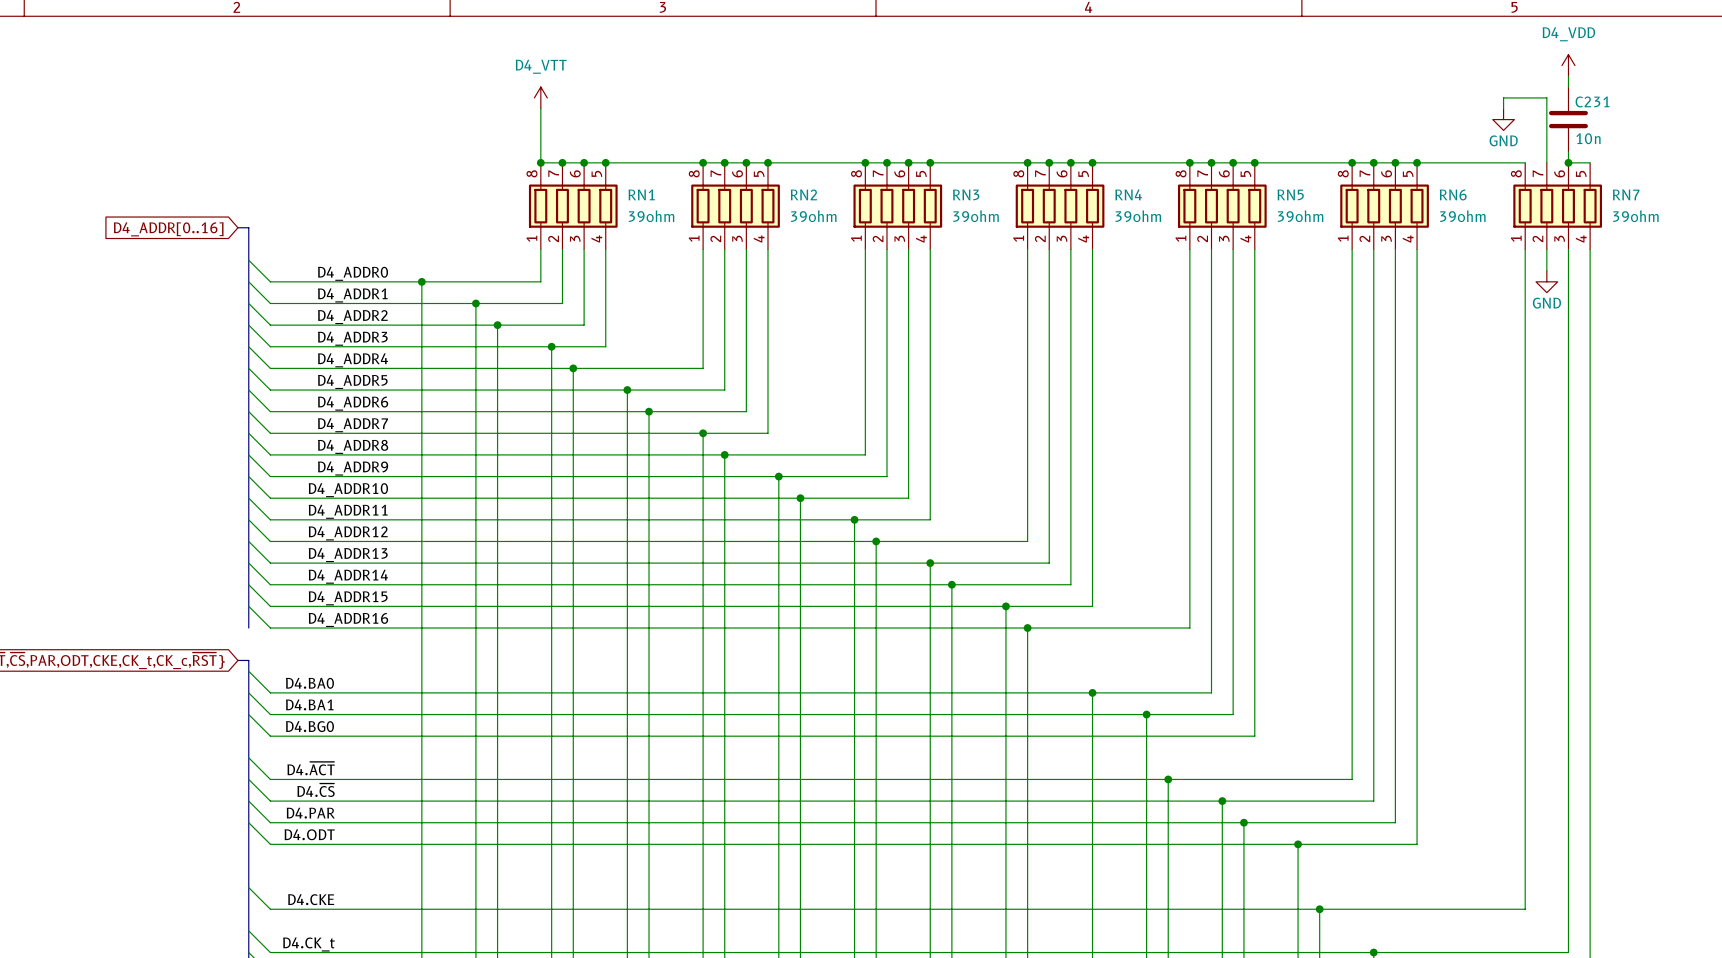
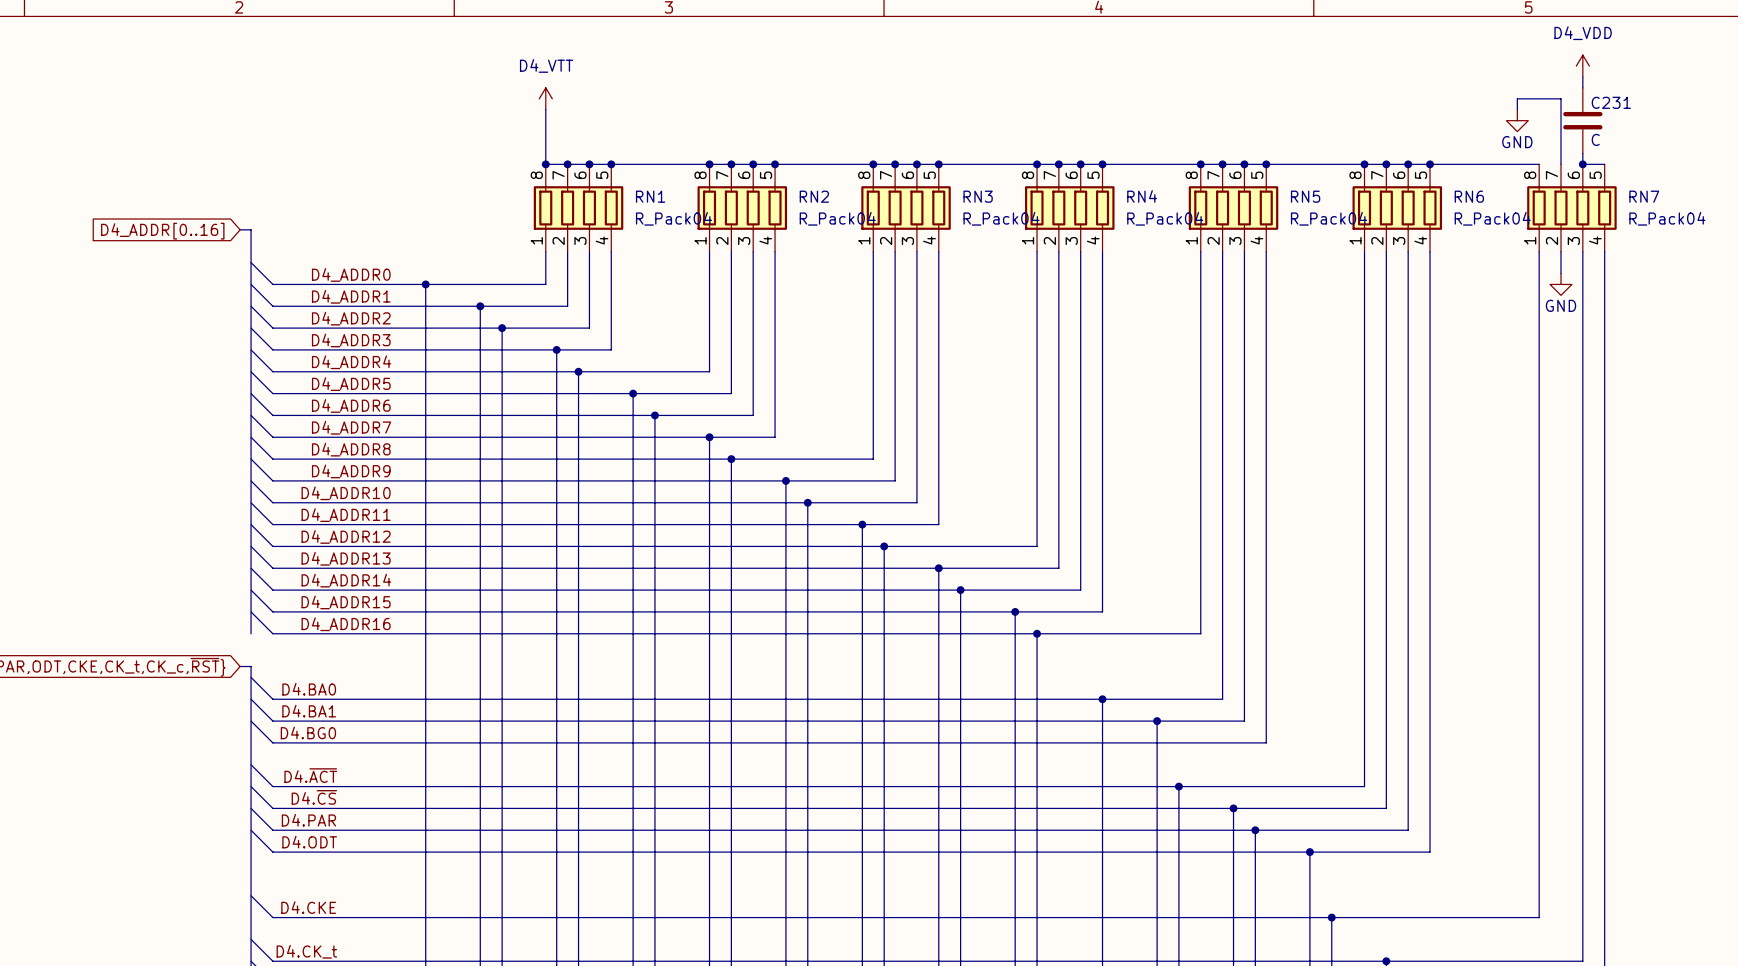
C231 value: 10n (1588, 138) -> C (1595, 139)
RN1 value: 39ohm (651, 216) -> R_Pack04 (674, 218)
RN2 value: 39ohm (813, 216) -> R_Pack04 (837, 218)
RN3 value: 39ohm (976, 216) -> R_Pack04 (1001, 218)
RN4 value: 39ohm (1138, 216) -> R_Pack04 (1165, 218)
RN5 value: 39ohm (1300, 216) -> R_Pack04 (1328, 218)
RN6 value: 39ohm (1462, 216) -> R_Pack04 (1492, 218)
RN7 value: 39ohm (1635, 216) -> R_Pack04 (1667, 218)

